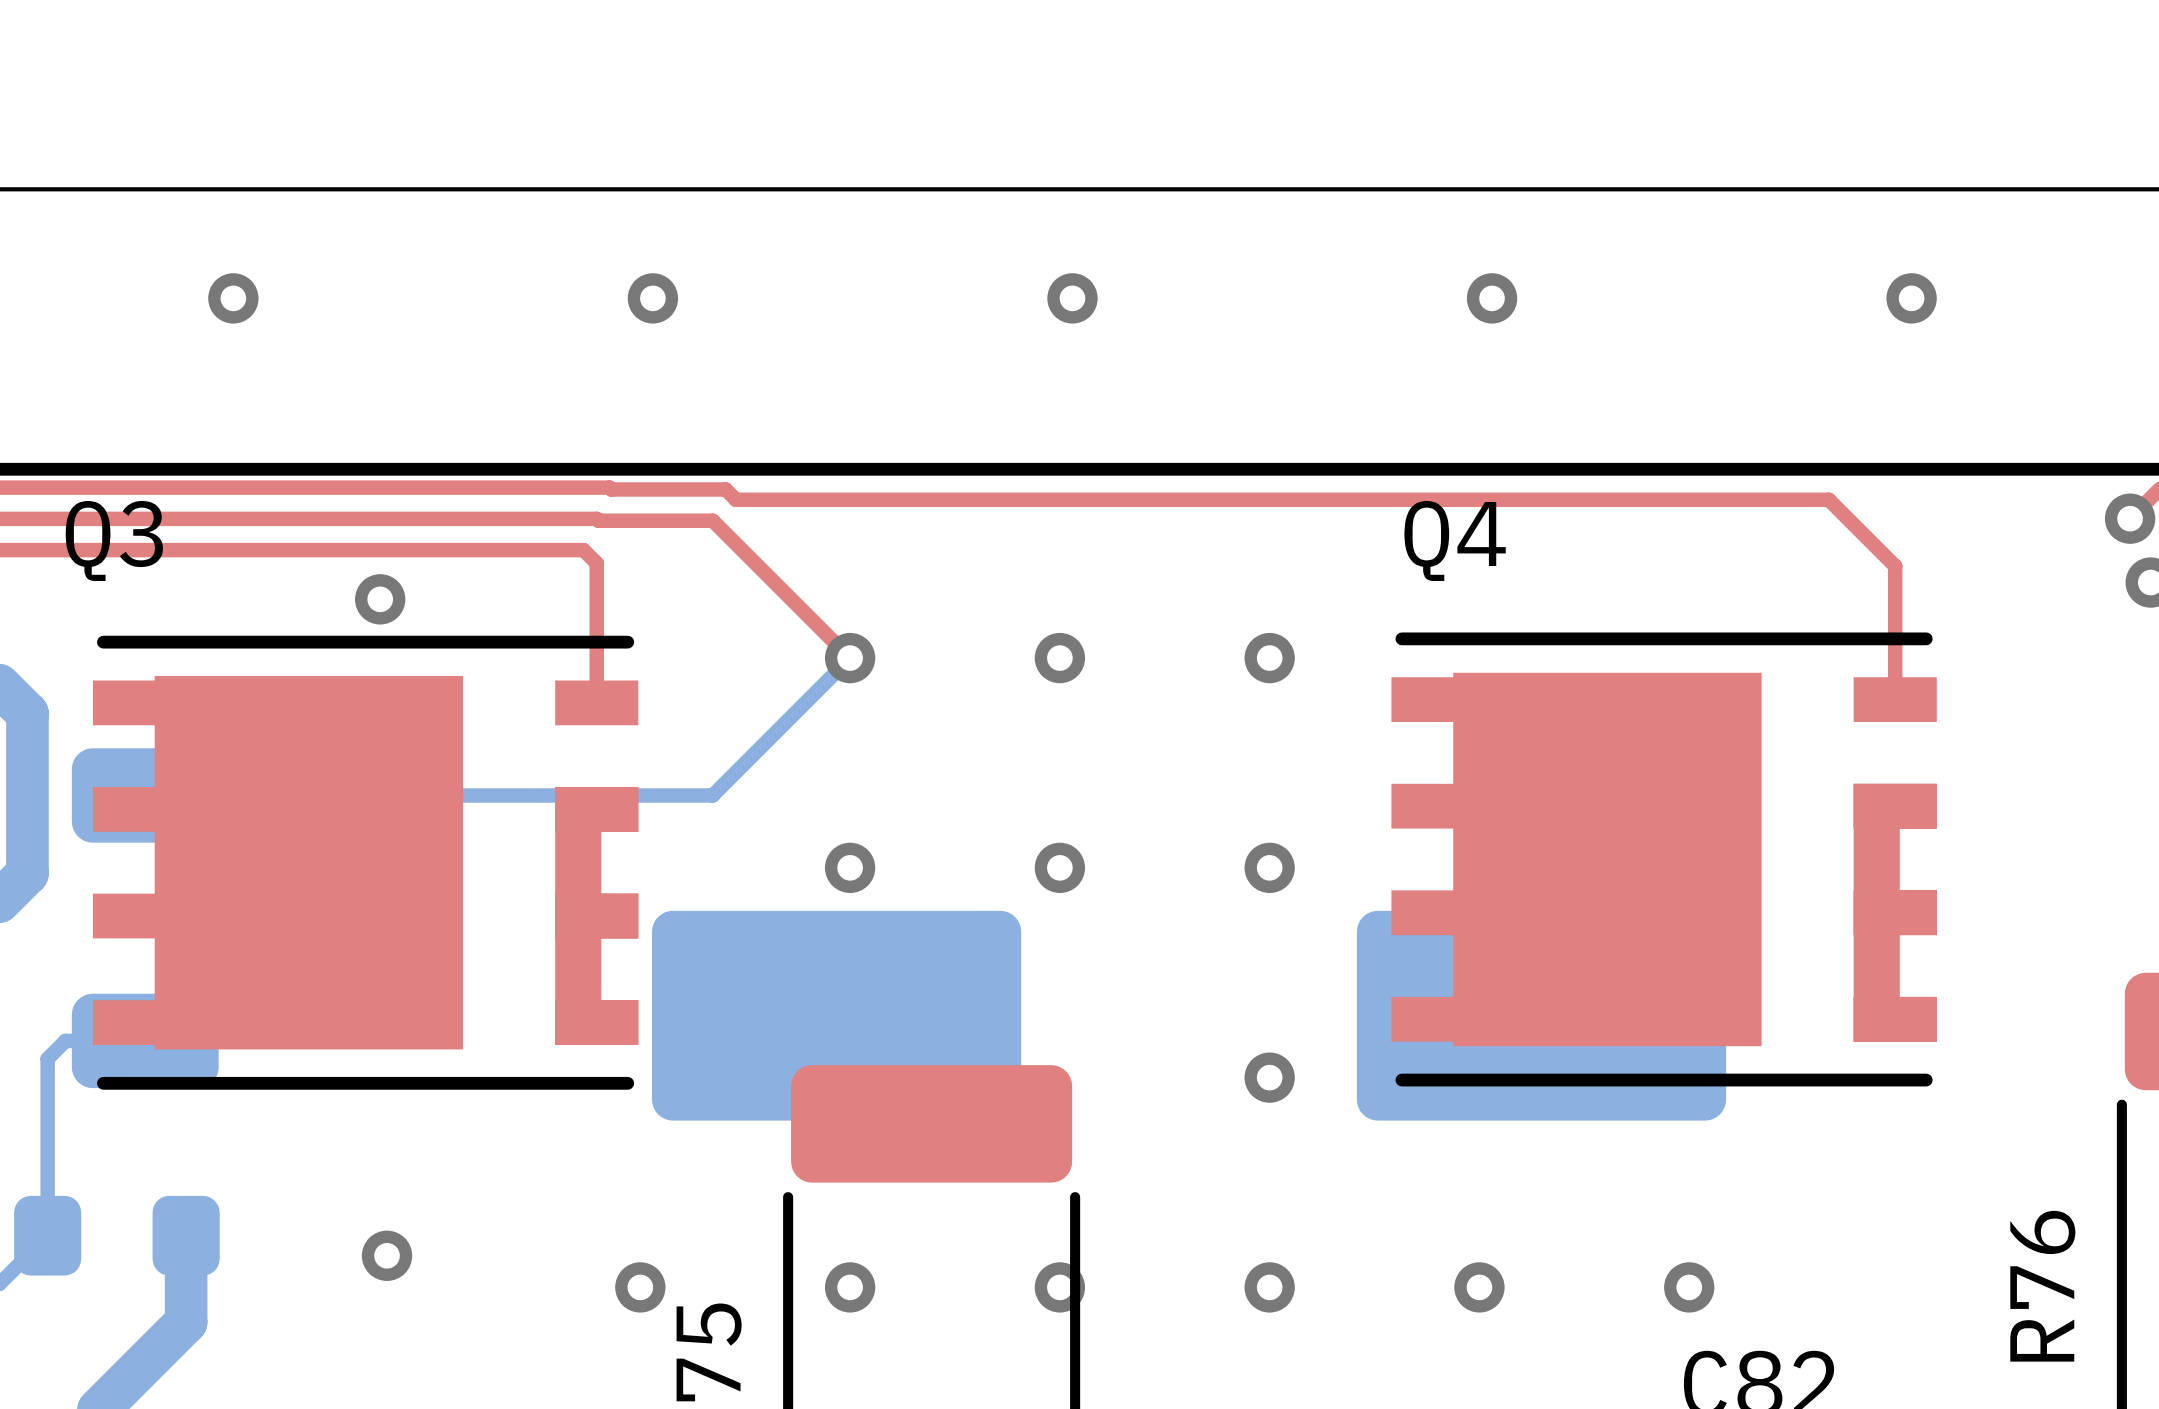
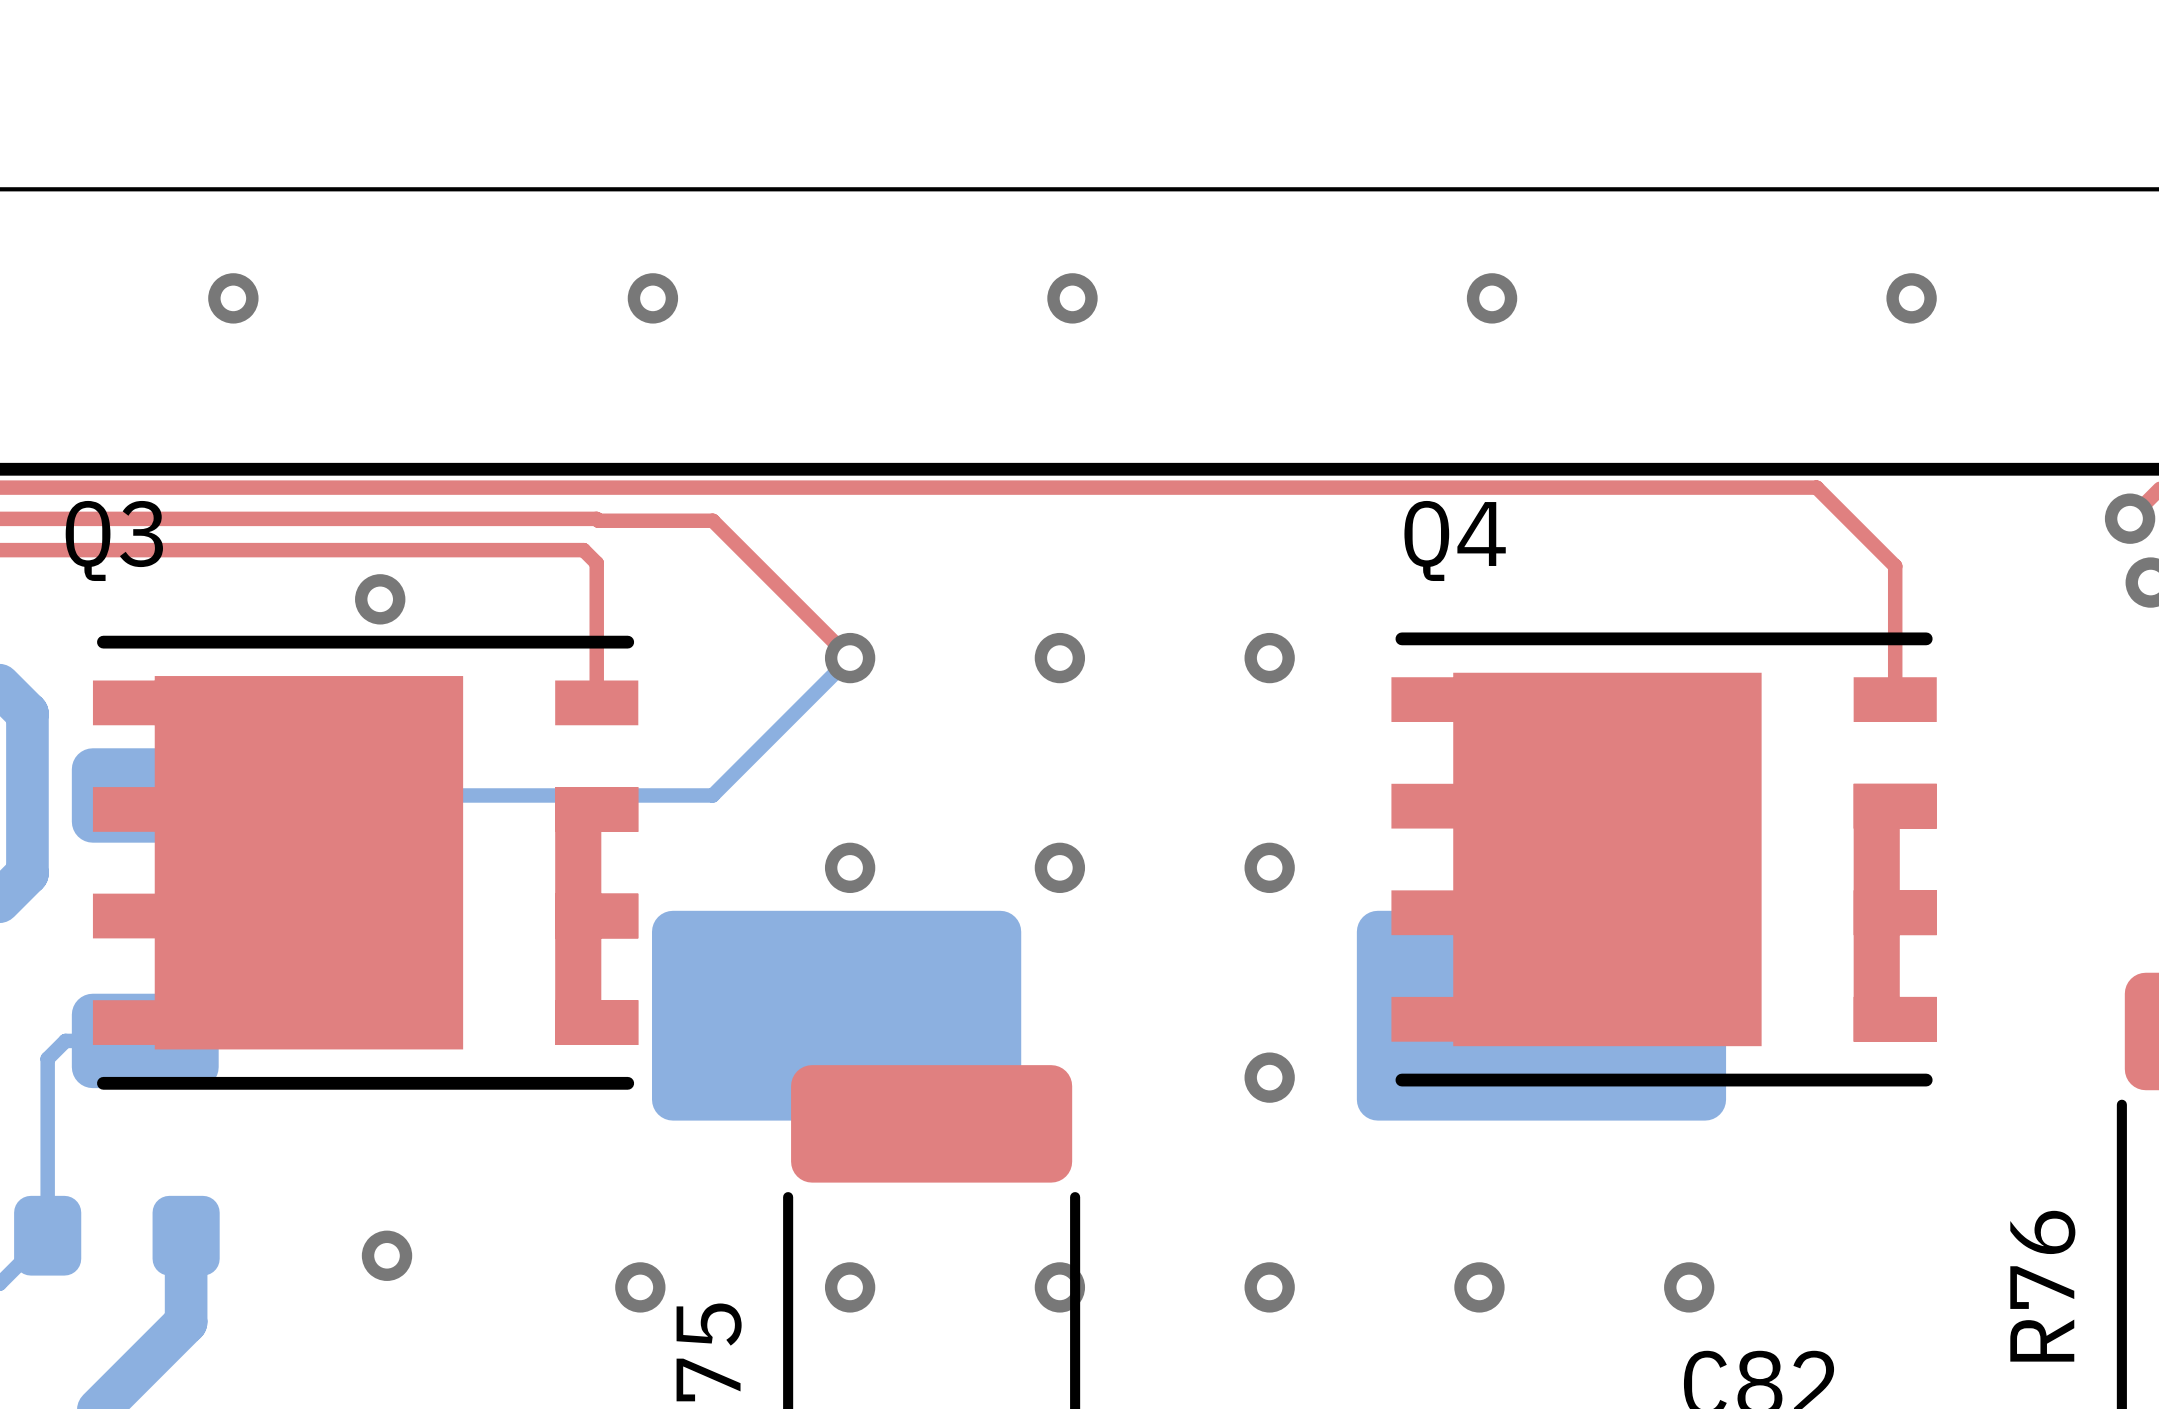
top track: (609, 487) (611, 489) (725, 489) (736, 499) (1828, 499) -> (609, 487) (1816, 487) (1828, 499)

